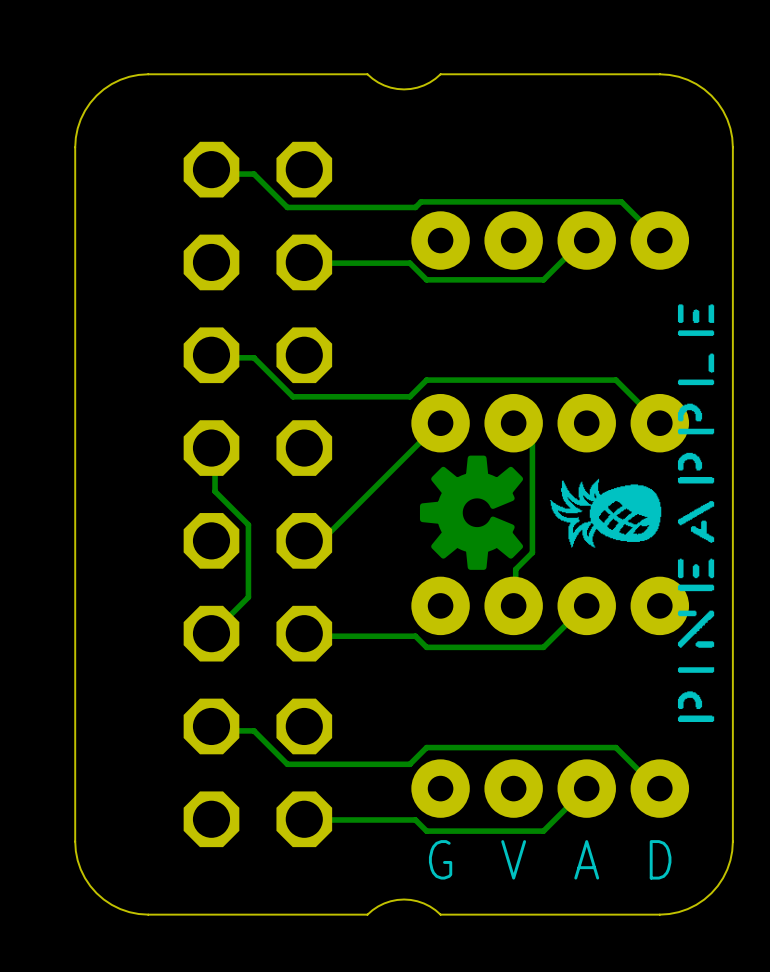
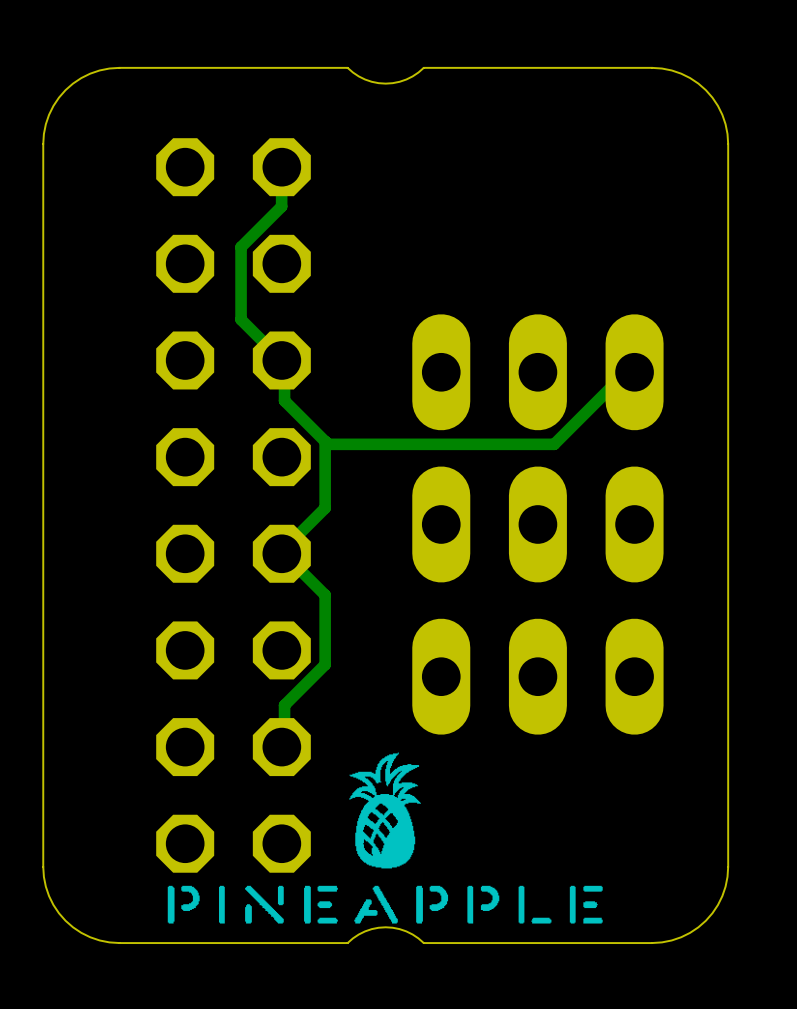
track: (211, 169) (215, 174) (254, 174) (287, 207) (415, 207) (421, 201) (621, 201) (659, 240) -> none
track: none -> (281, 167) (281, 206) (241, 247) (241, 319) (284, 363) (284, 400) (328, 444) (554, 444) (623, 374) (632, 374) (634, 372)
part: (550, 240) -> none
track: (586, 240) (582, 240) (543, 279) (426, 279) (409, 263) (304, 262) -> none
drawing: [419, 304, 715, 723] -> none
track: (211, 355) (215, 357) (254, 357) (292, 396) (409, 396) (426, 380) (615, 380) (659, 423) -> none
part: none -> (537, 372)
track: (440, 423) (326, 535) (309, 535) (304, 540) -> none
track: (513, 423) (532, 441) (532, 552) (515, 569) (515, 602) (513, 605) -> none
part: (550, 423) -> none
track: none -> (325, 441) (325, 508) (284, 548) (281, 553) (325, 595) (325, 664) (284, 705) (284, 745) (281, 747)
track: (211, 448) (215, 452) (215, 491) (248, 524) (248, 597) (211, 633) -> none
part: none -> (537, 524)
part: (550, 605) -> none
track: (586, 605) (543, 647) (426, 647) (415, 636) (309, 636) (304, 633) -> none
part: none -> (537, 676)
track: (211, 726) (215, 730) (254, 730) (287, 764) (409, 764) (426, 747) (615, 747) (654, 786) (659, 788) -> none
drawing: none -> [167, 752, 603, 924]
part: (550, 788) -> none
track: (586, 788) (543, 831) (426, 831) (415, 819) (304, 819) -> none
text: G (440, 859) -> none
text: V (513, 859) -> none
text: A (586, 859) -> none
text: D (660, 859) -> none

